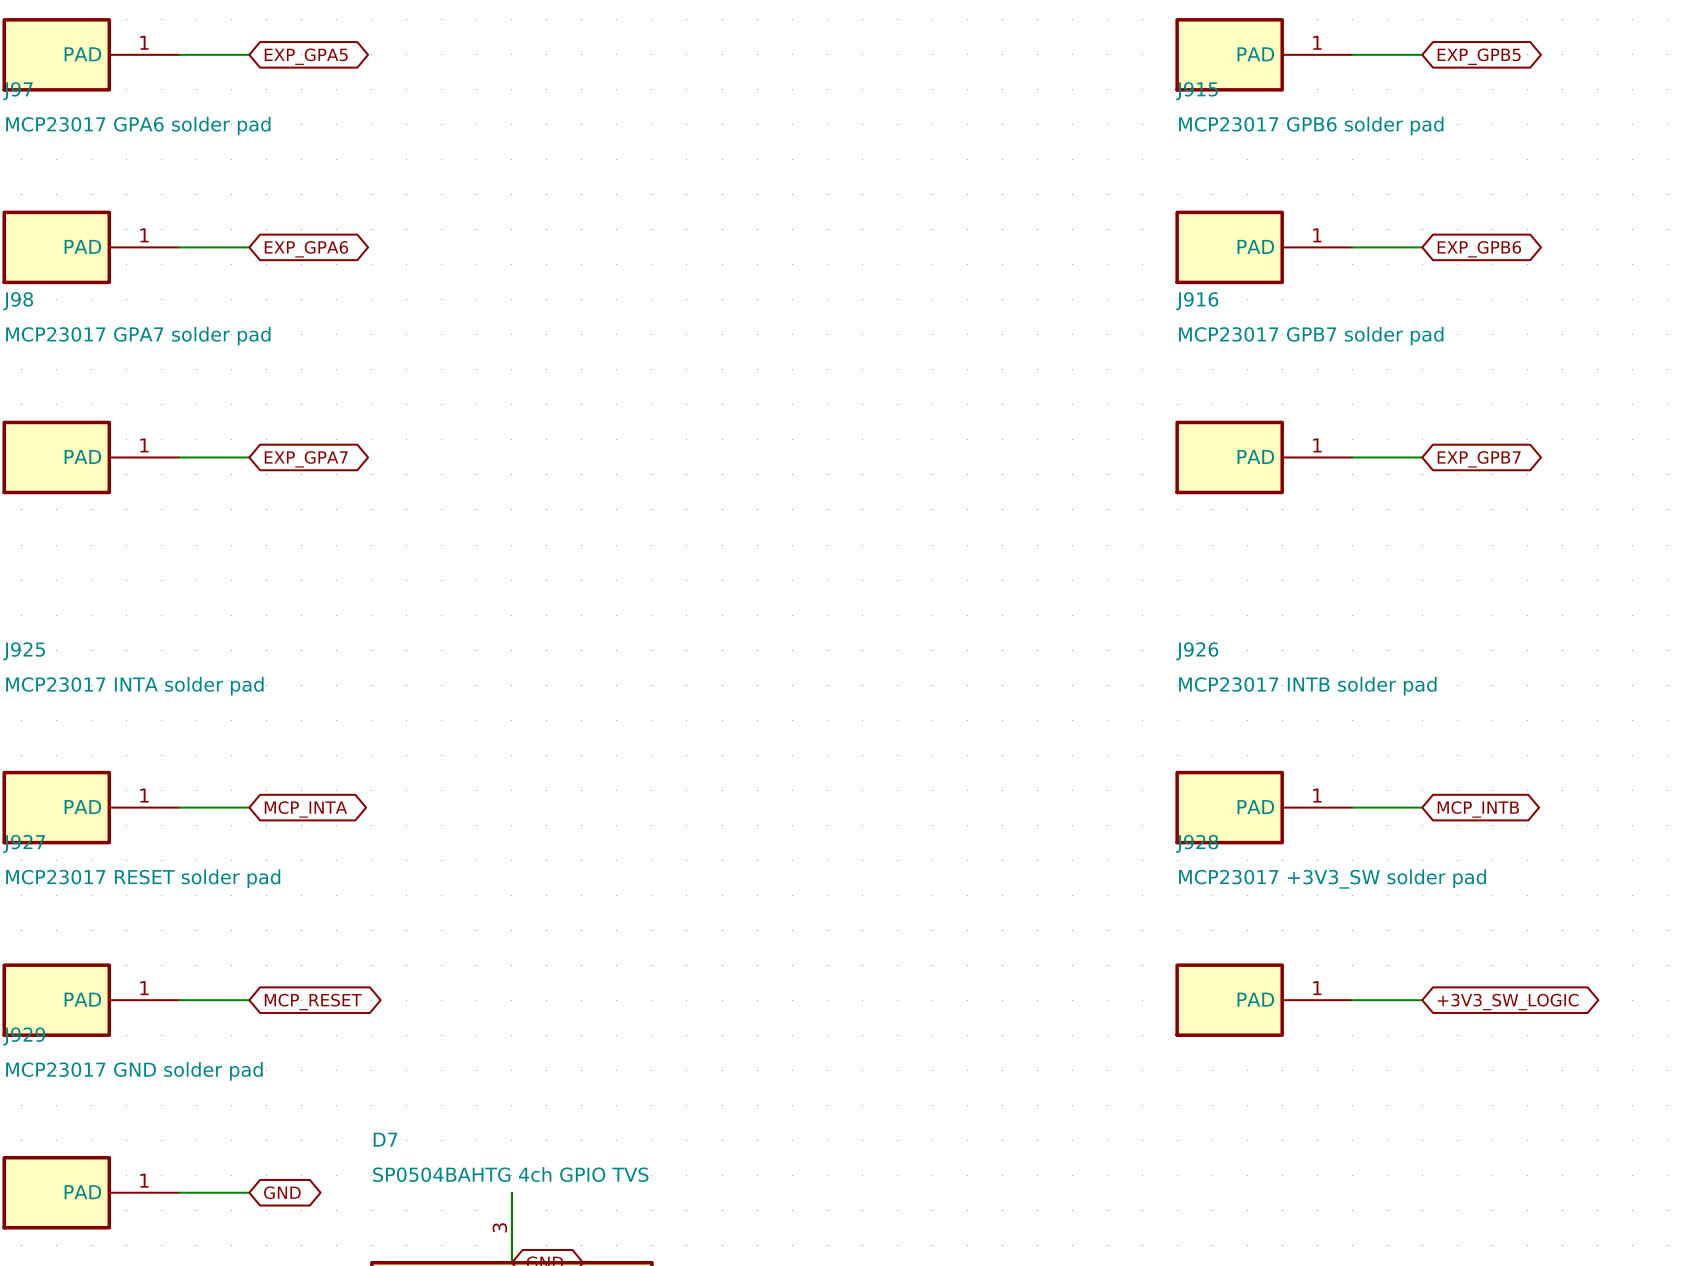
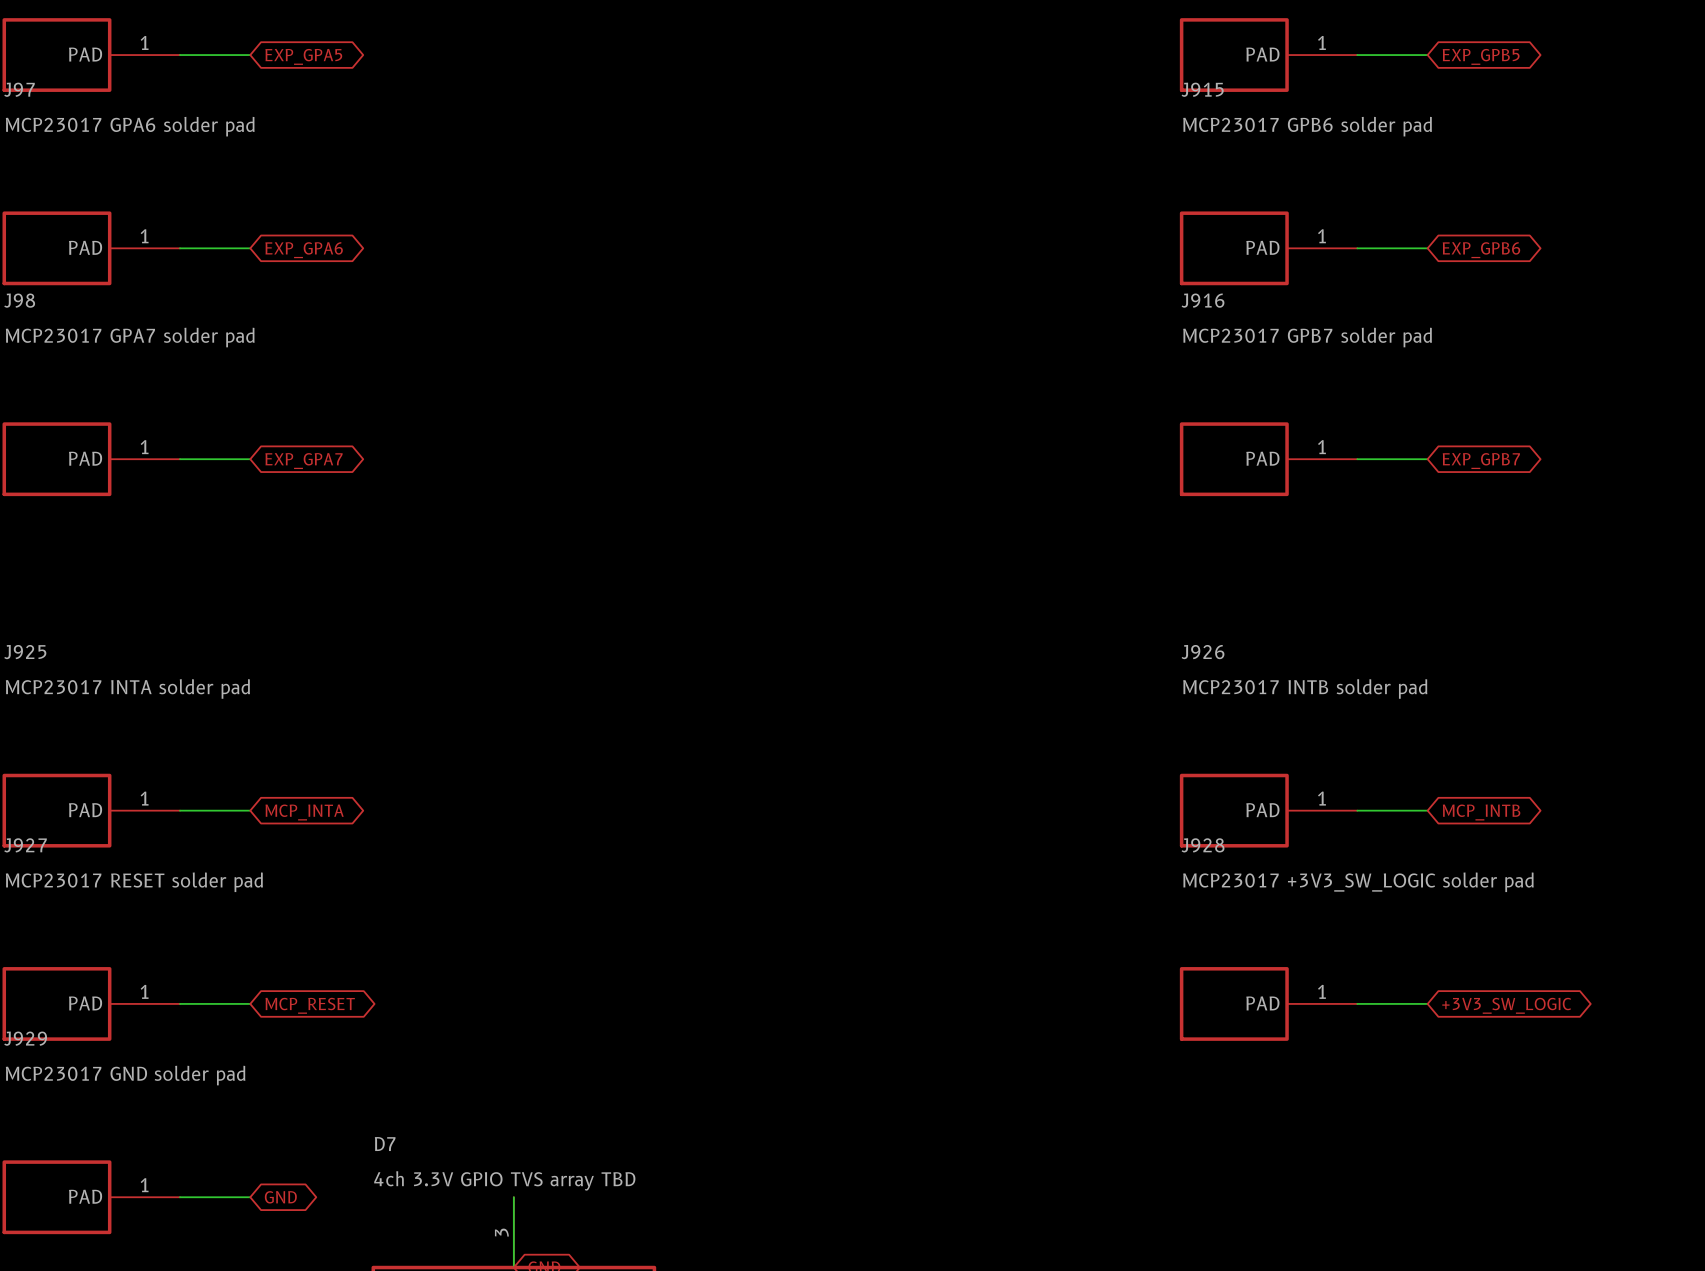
J928 value: MCP23017 +3V3_SW solder pad (1332, 879) -> MCP23017 +3V3_SW_LOGIC solder pad (1358, 882)
D7 value: SP0504BAHTG 4ch GPIO TVS (510, 1174) -> 4ch 3.3V GPIO TVS array TBD (504, 1180)

